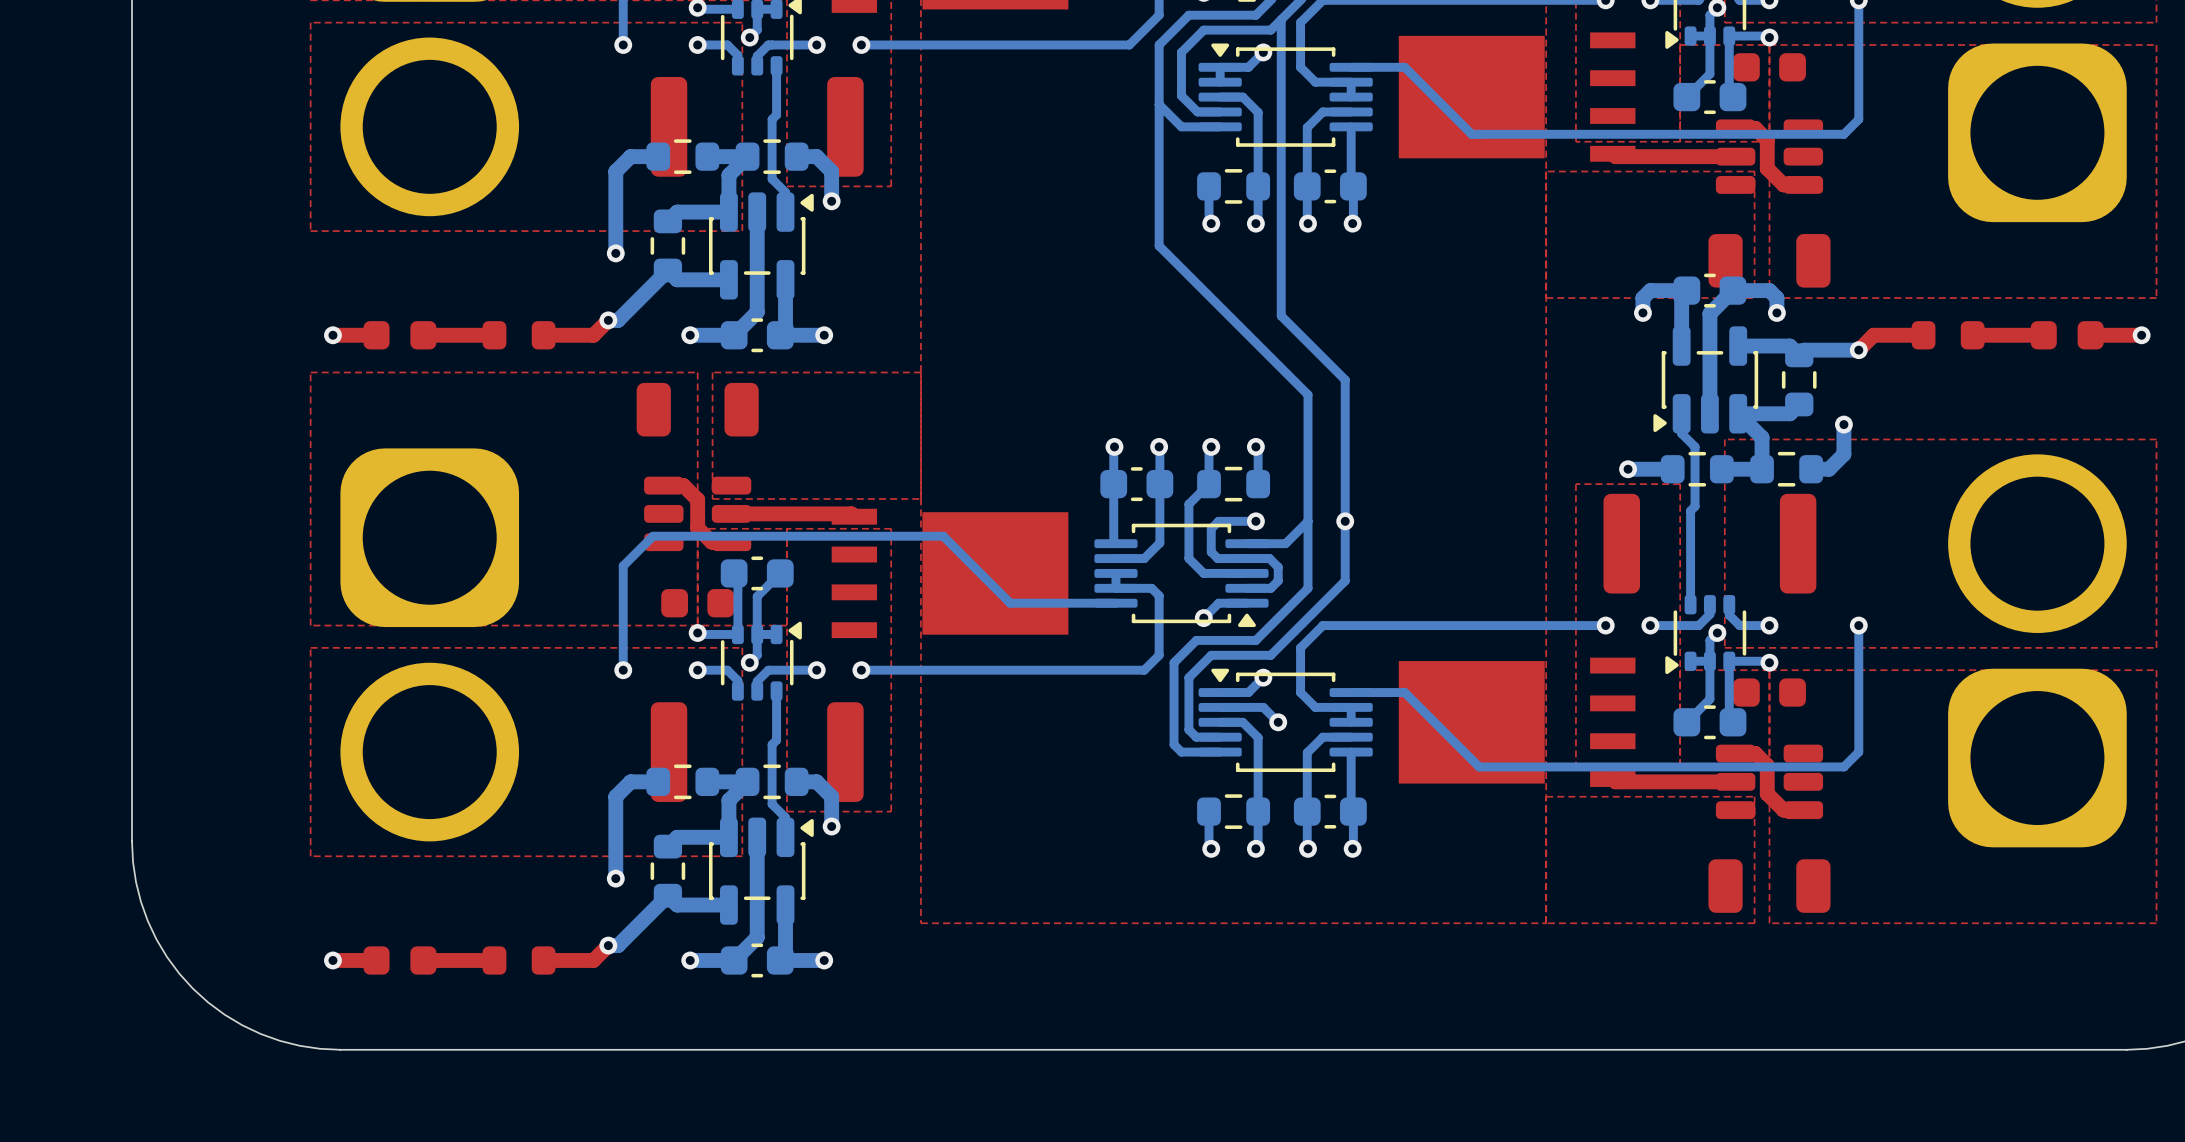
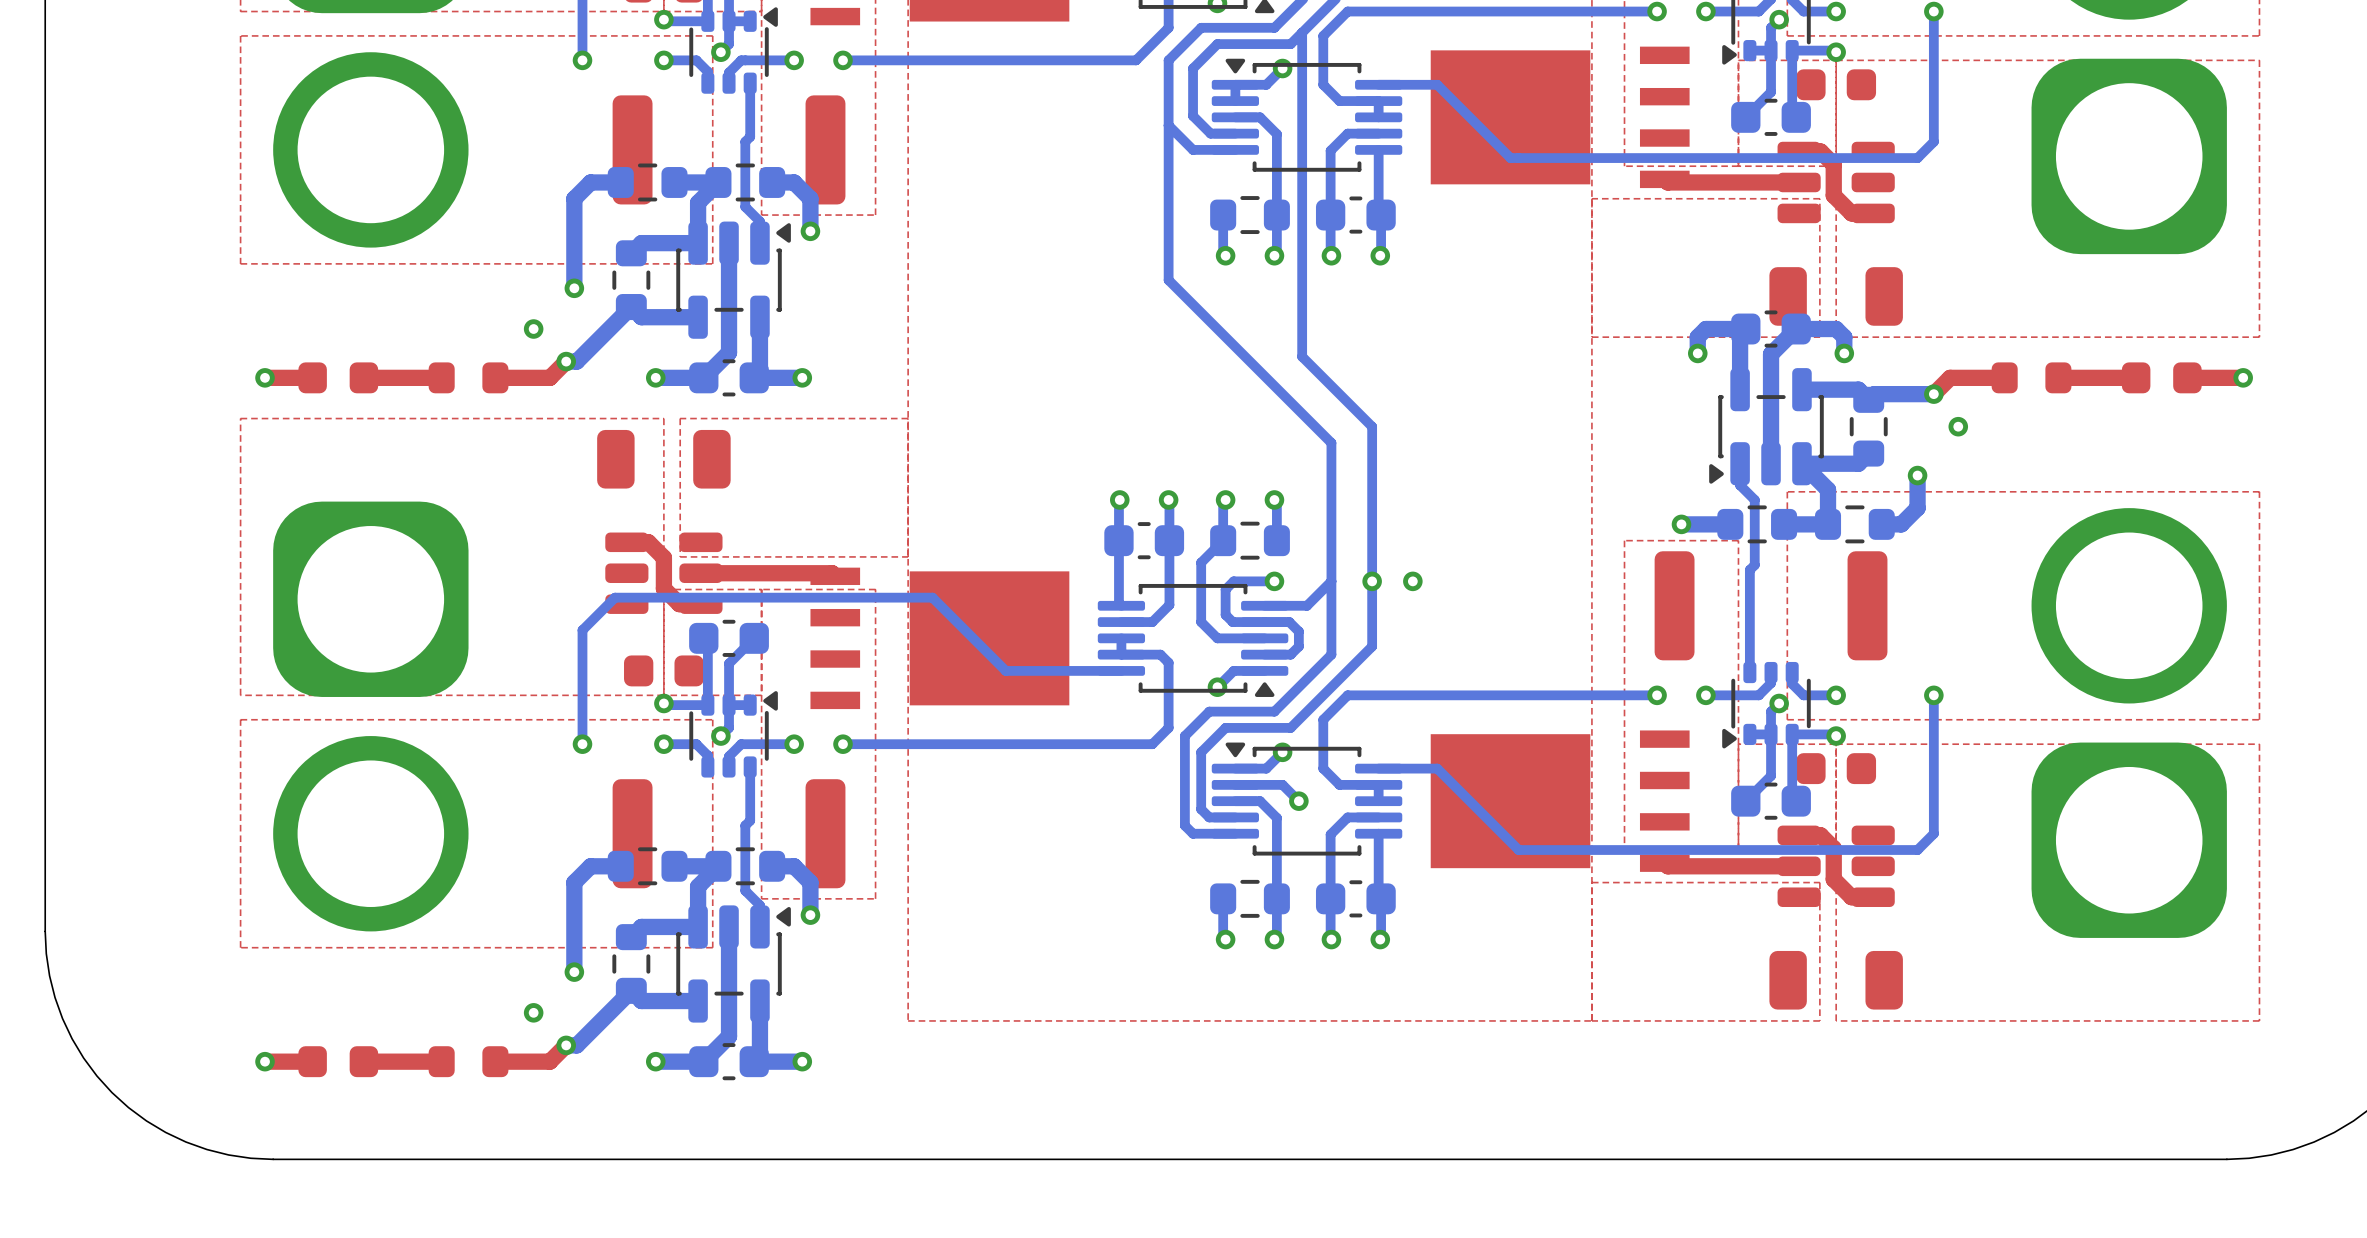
via: none -> (533, 329)
via: none -> (1958, 426)
via: none -> (1412, 581)
via: none -> (533, 1012)

